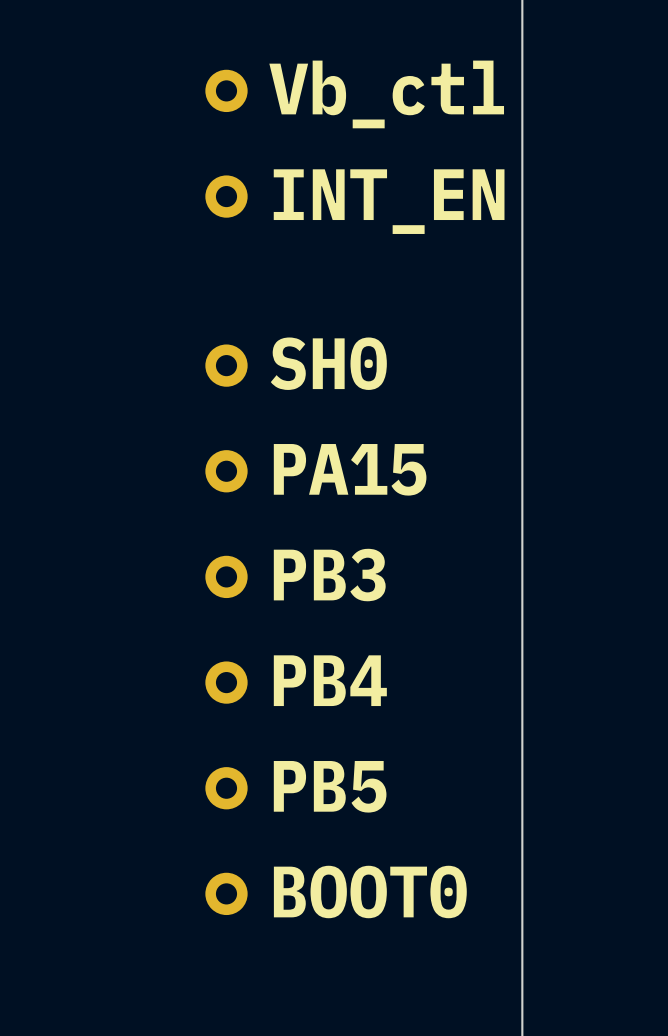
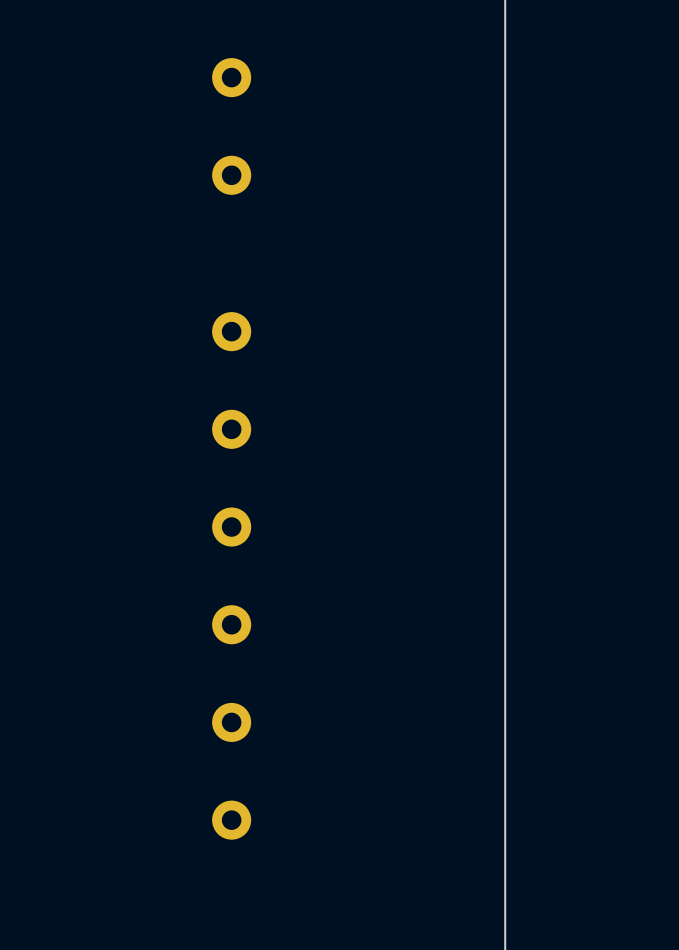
text: Vb_ctl (386, 94) -> none
text: INT_EN (389, 201) -> none
text: SH0 (328, 363) -> none
text: PA15 (350, 469) -> none
text: PB3 (329, 575) -> none
text: PB4 (330, 680) -> none
text: PB5 (330, 786) -> none
text: BOOT0 (370, 892) -> none

